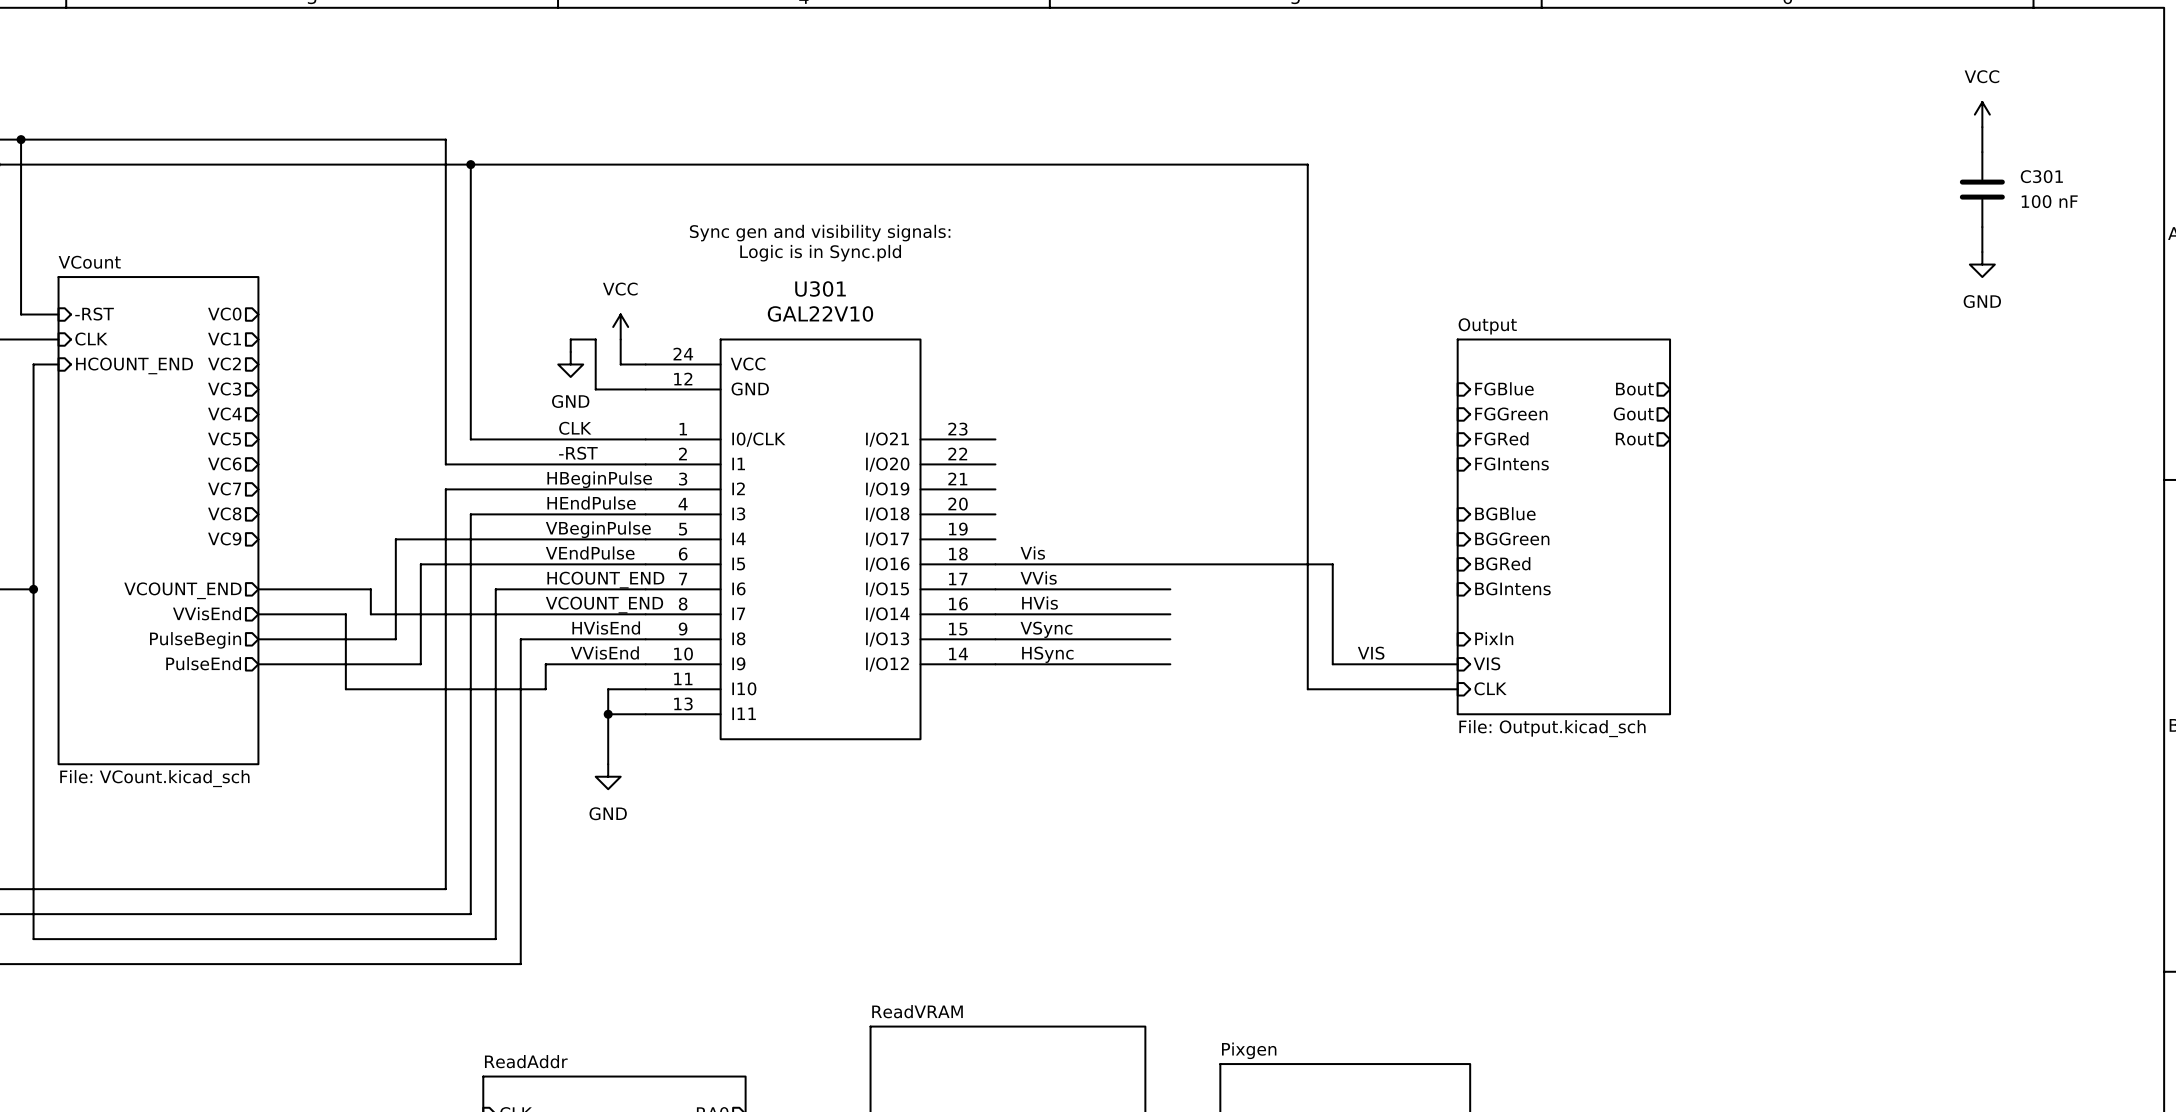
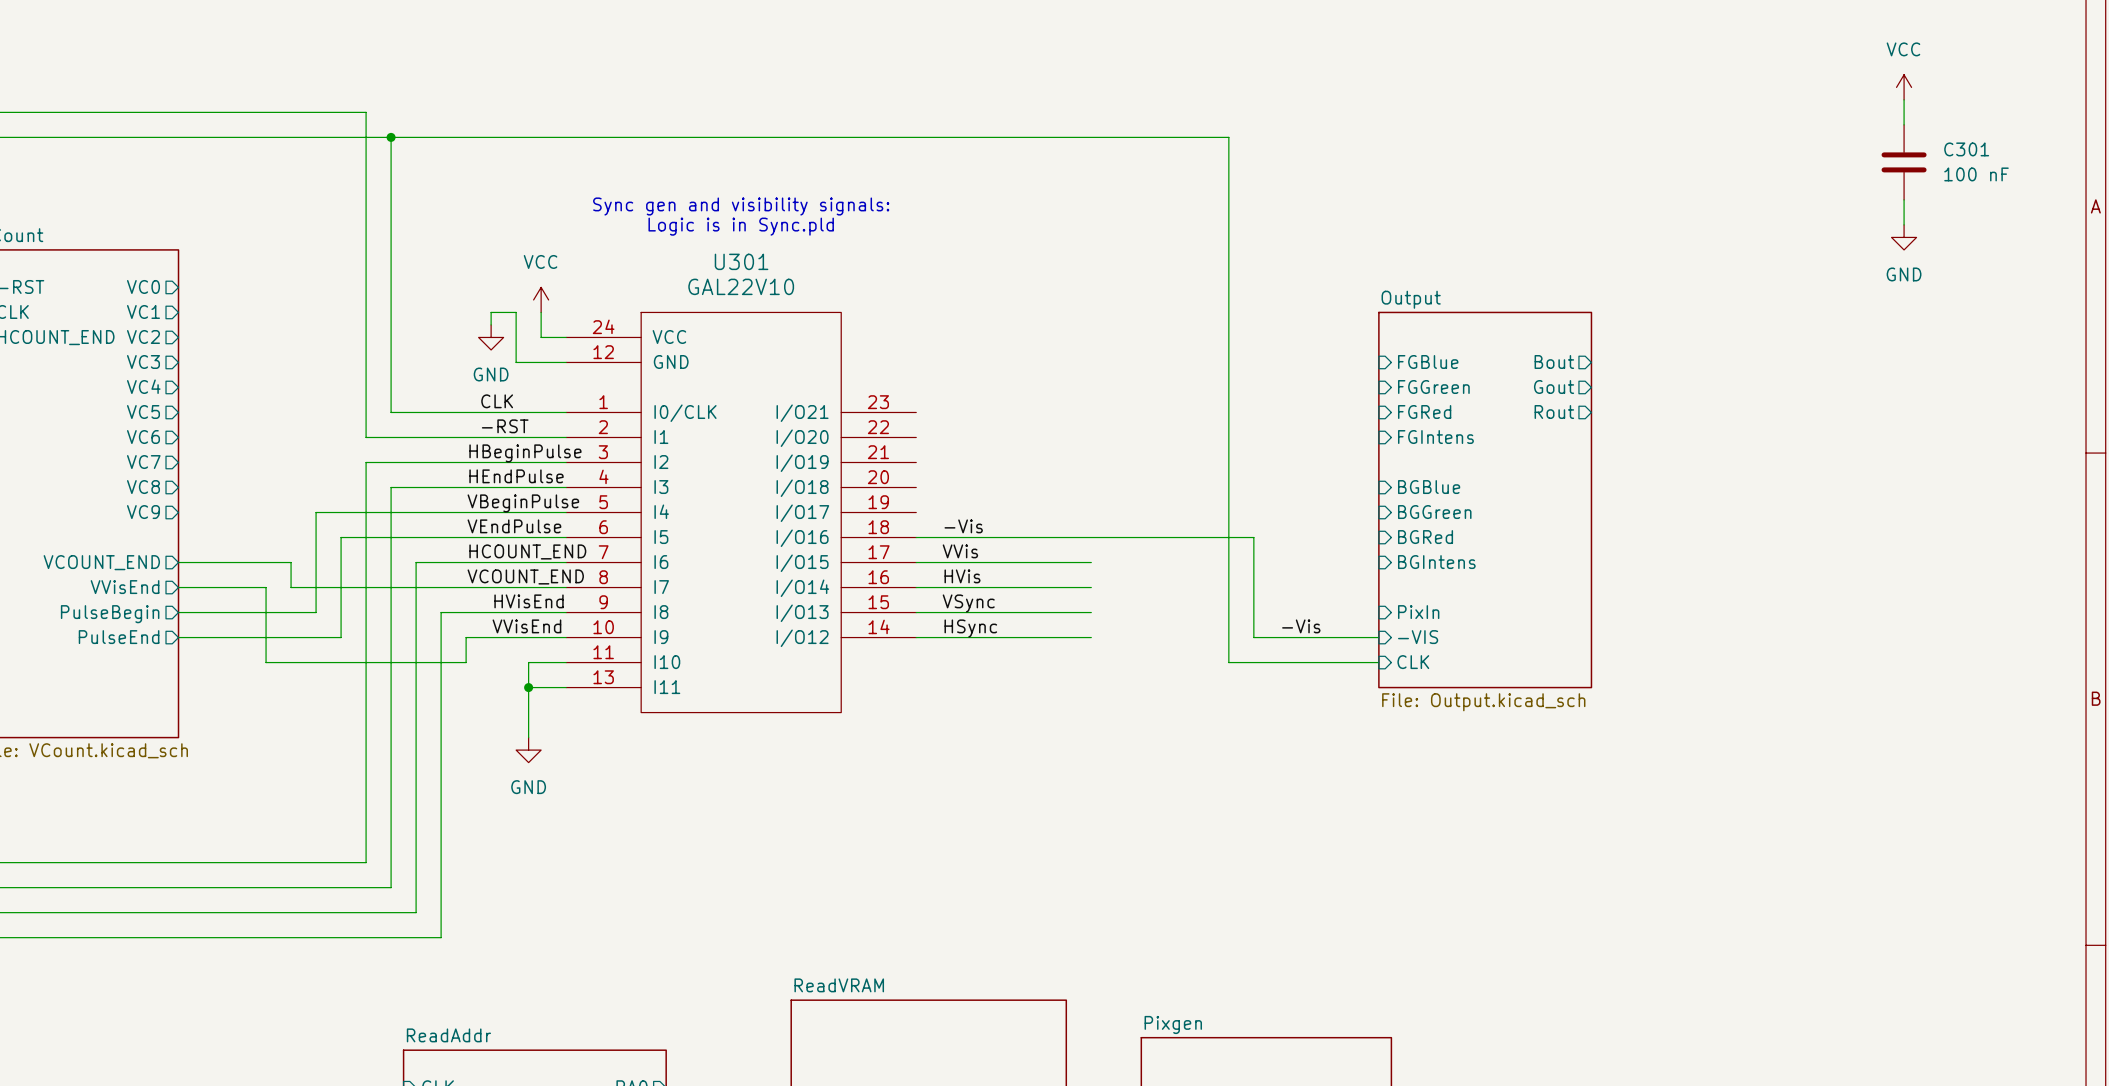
label: Vis (1032, 553) -> -Vis (963, 526)
label: VIS (1371, 653) -> -Vis (1301, 626)
sheet pin: VIS (1486, 663) -> -VIS (1418, 637)

